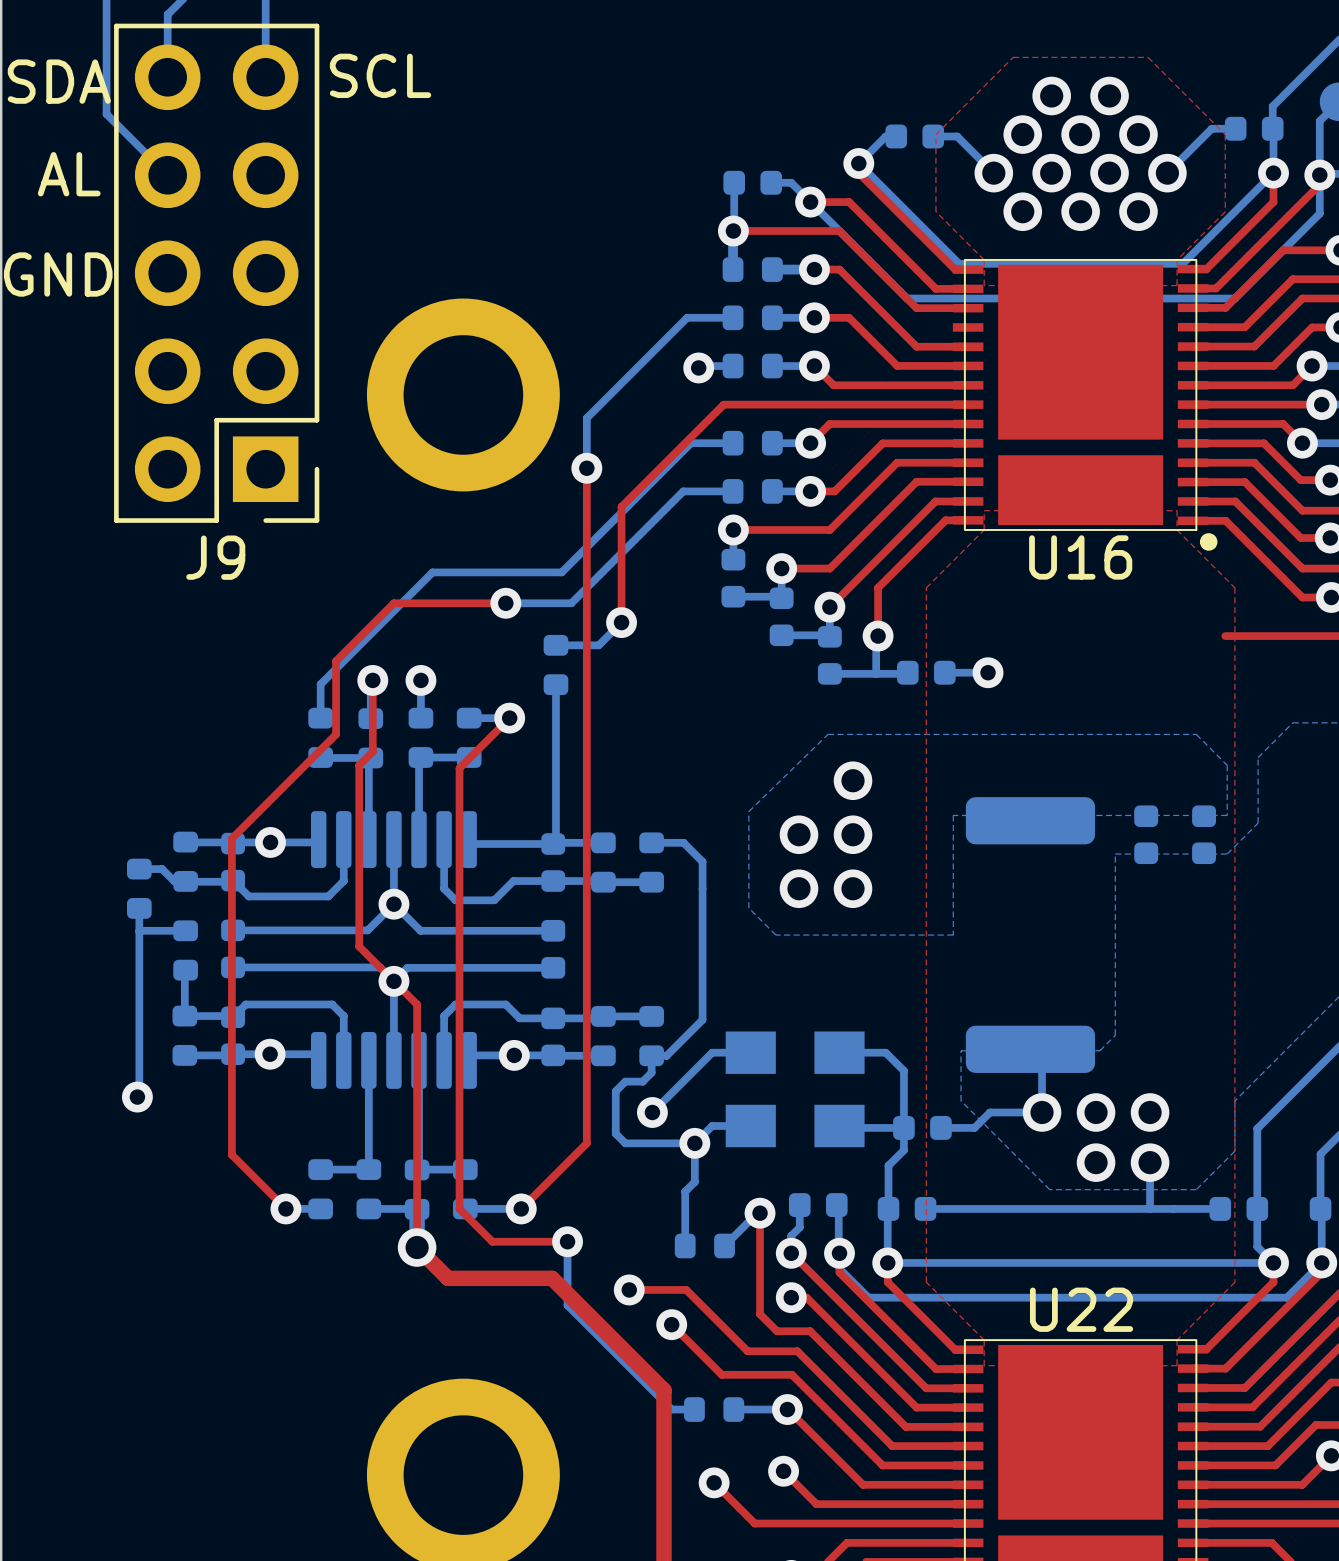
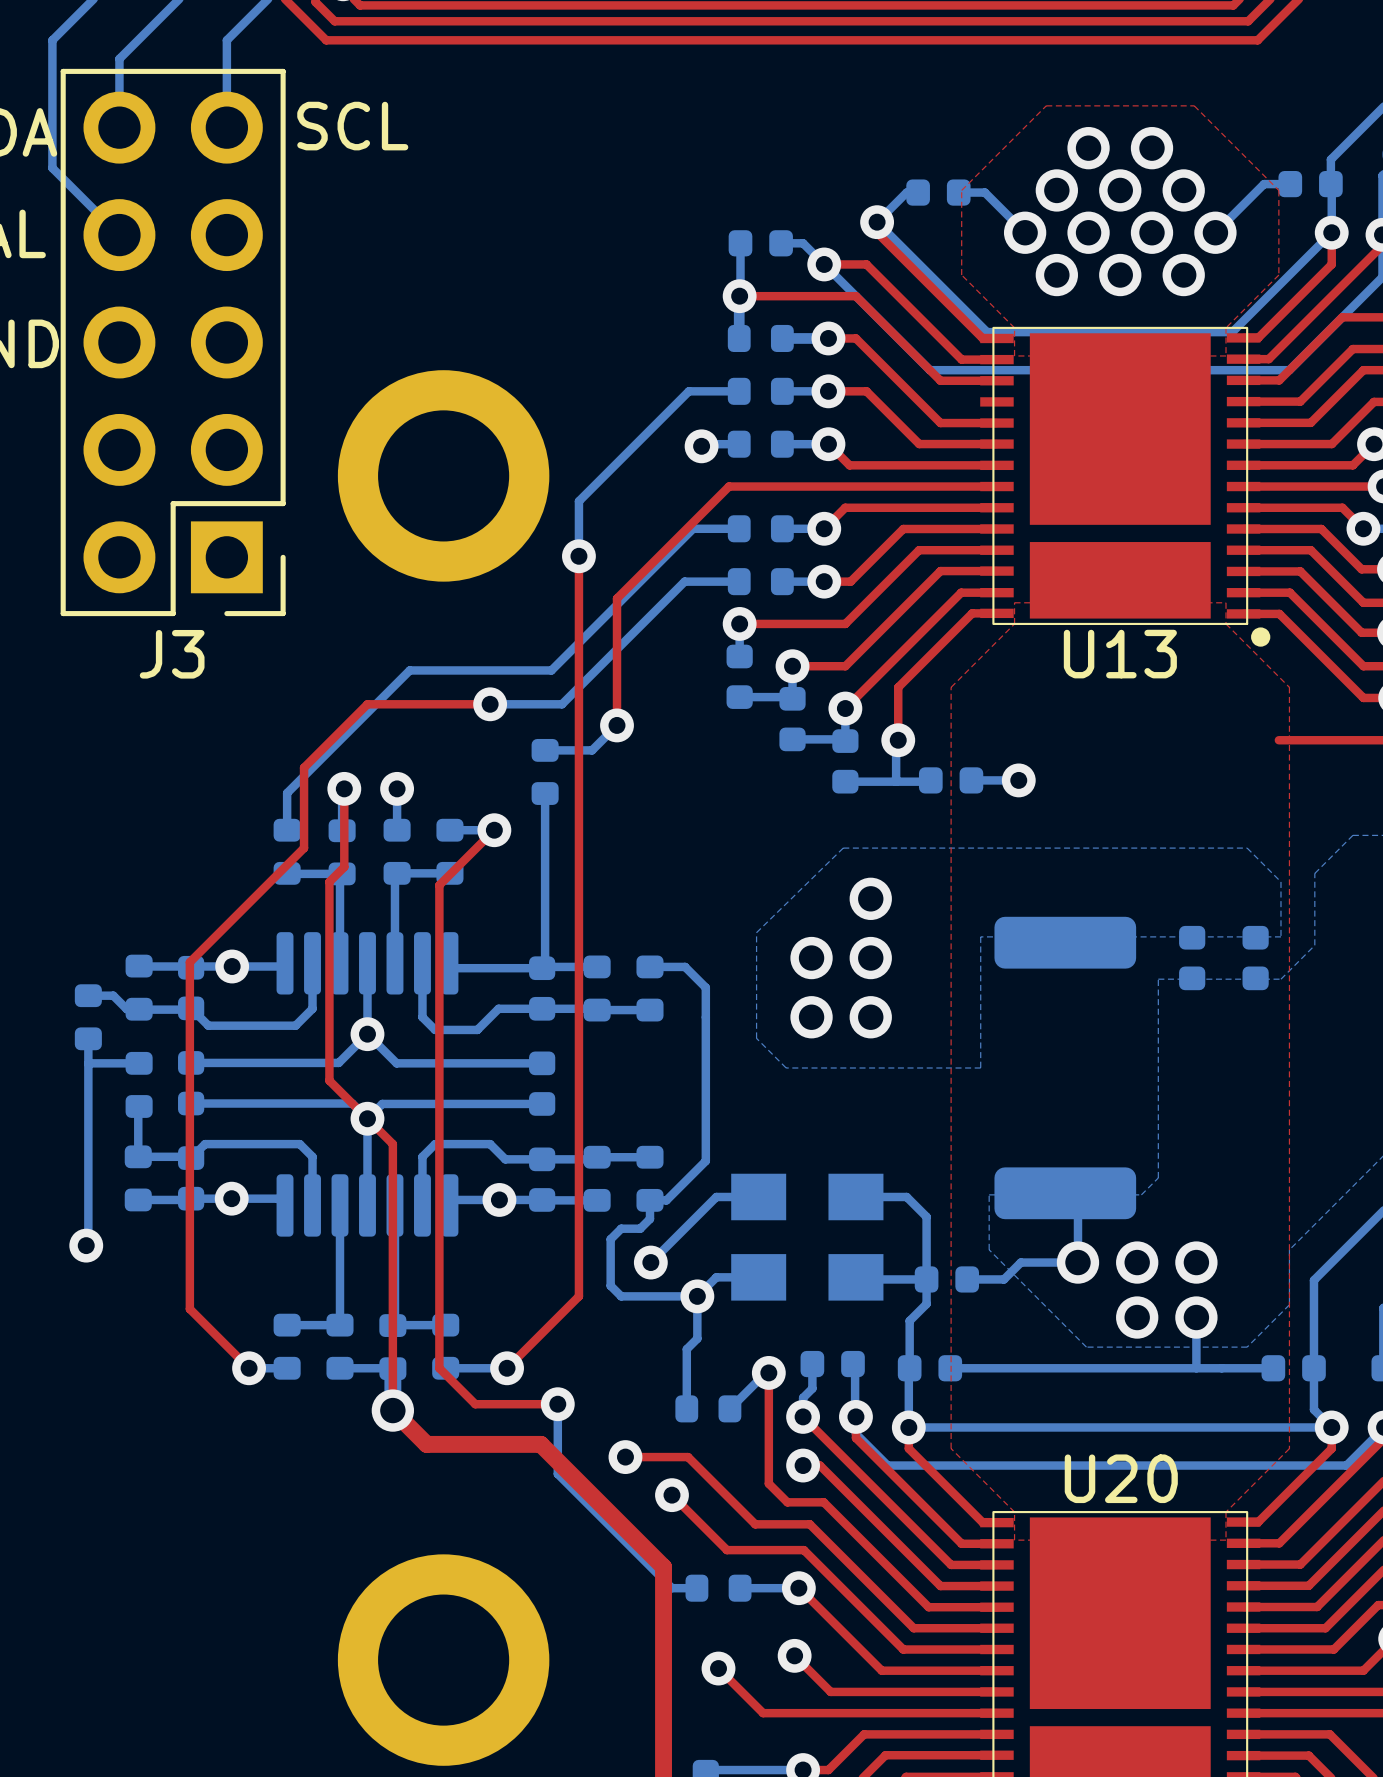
J9 name: J9 (215, 557) -> J3 (172, 654)
U16 name: U16 (1080, 557) -> U13 (1120, 654)
U22 name: U22 (1081, 1309) -> U20 (1121, 1478)

